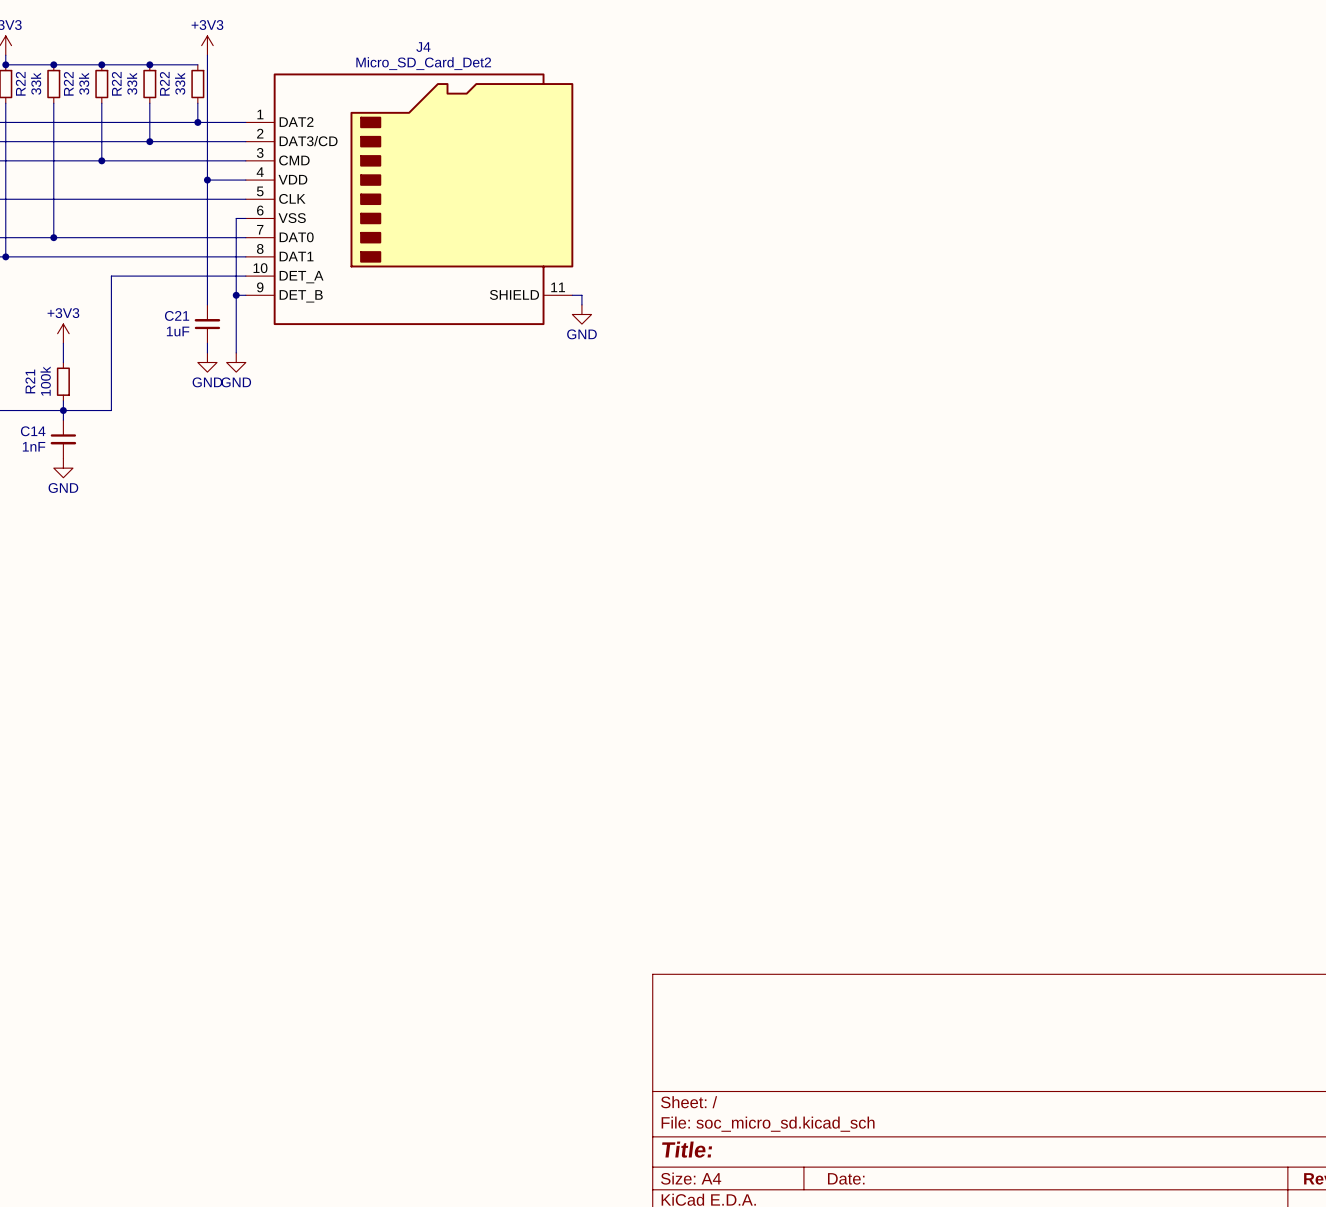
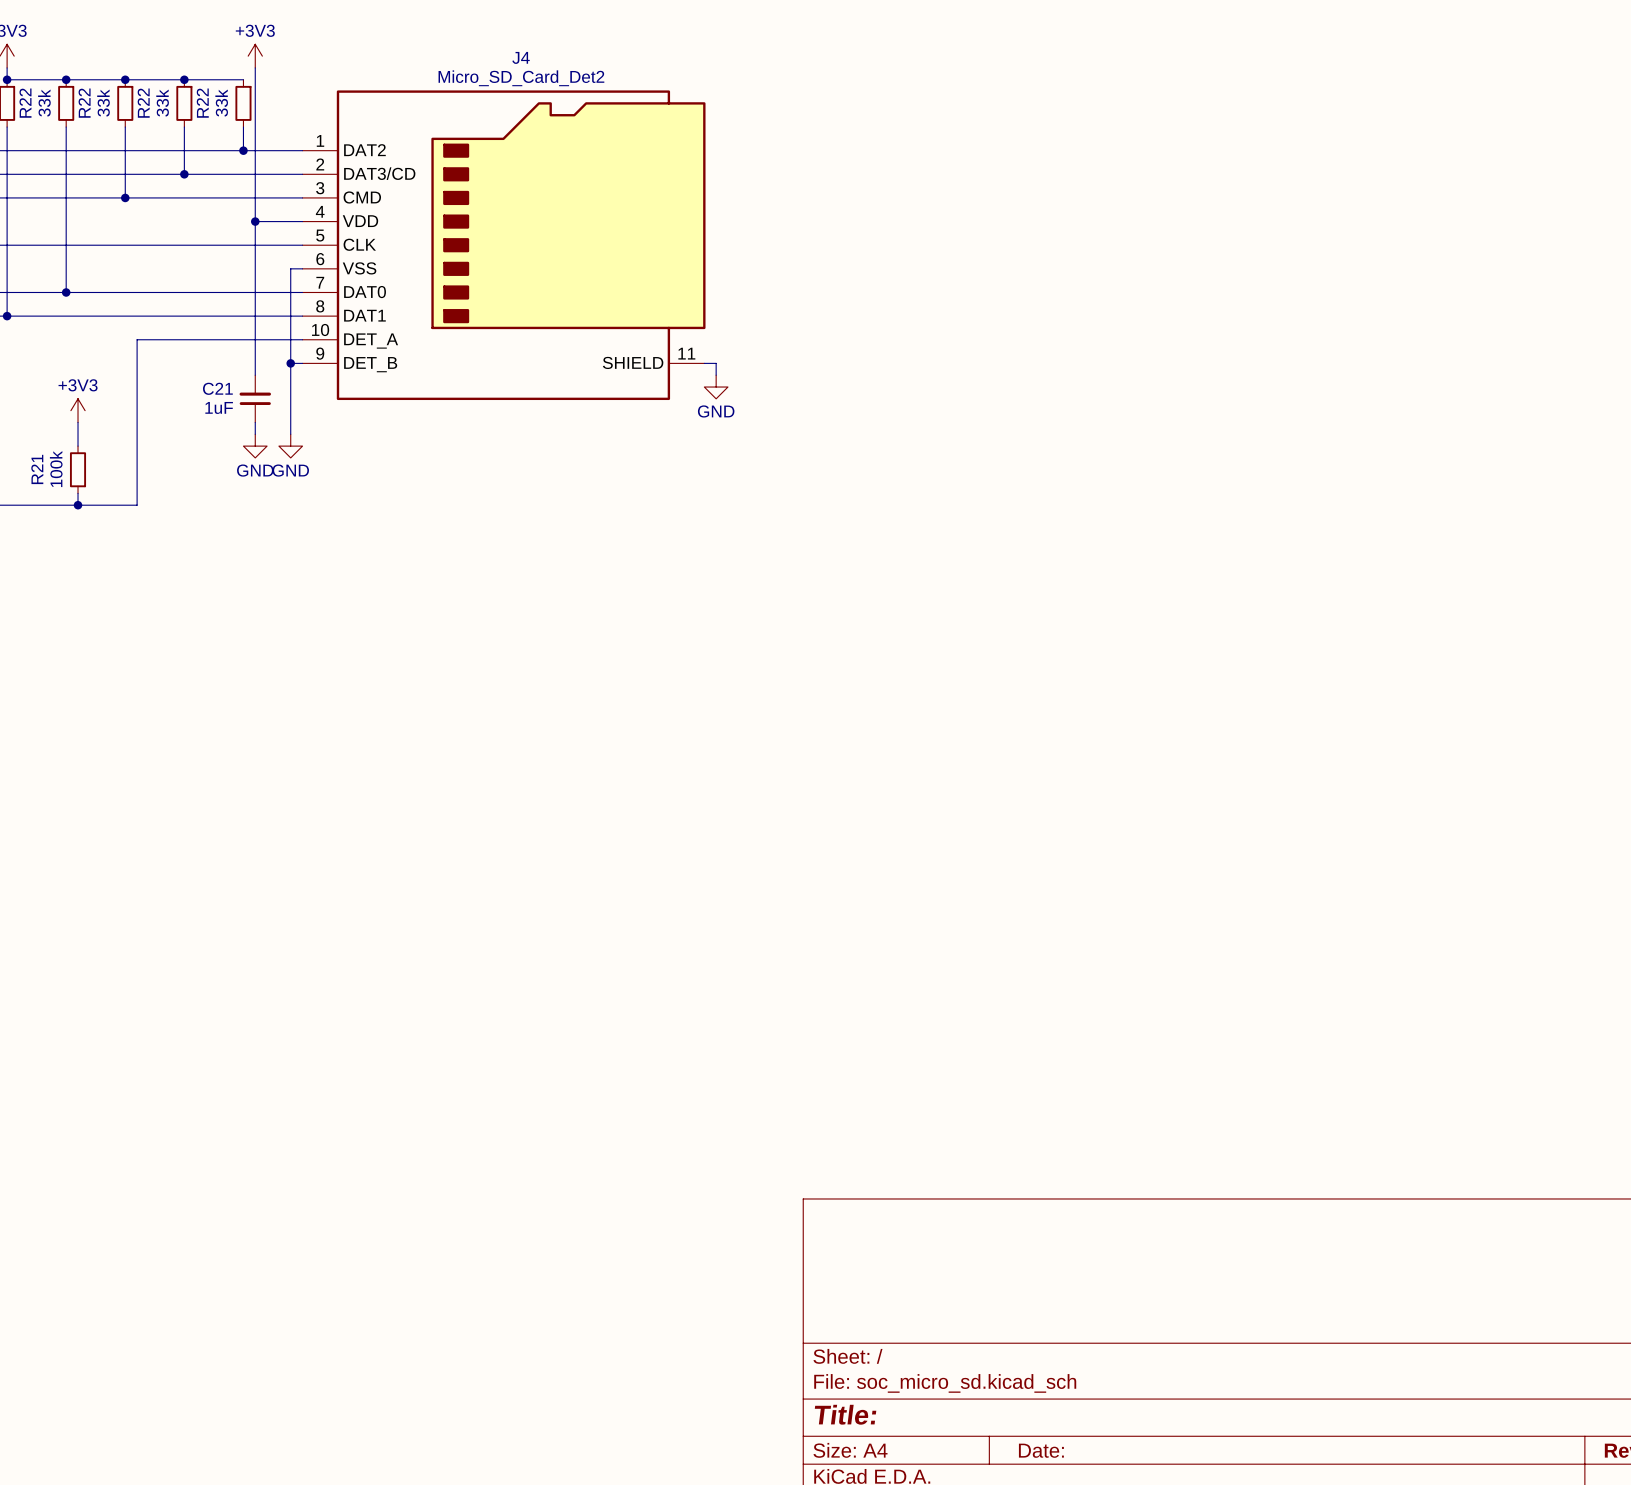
wire: (63, 410) (63, 420) -> none
C14: 1nF (63, 439) -> none
power symbol: GND (63, 468) -> none

